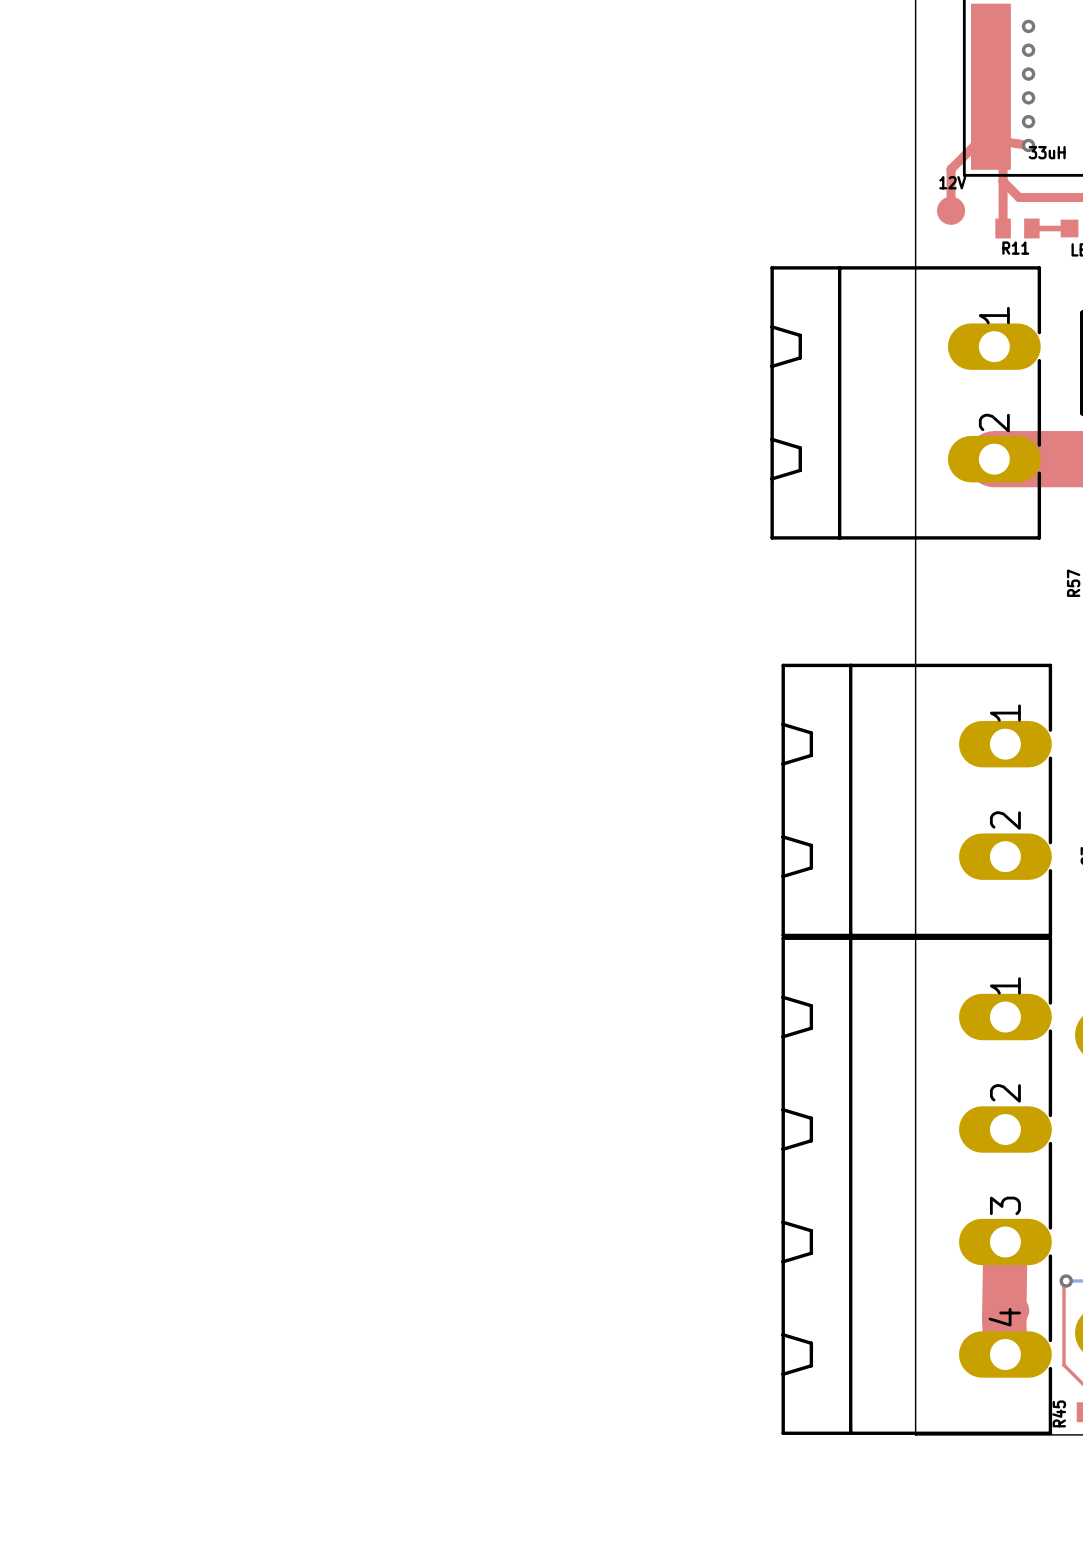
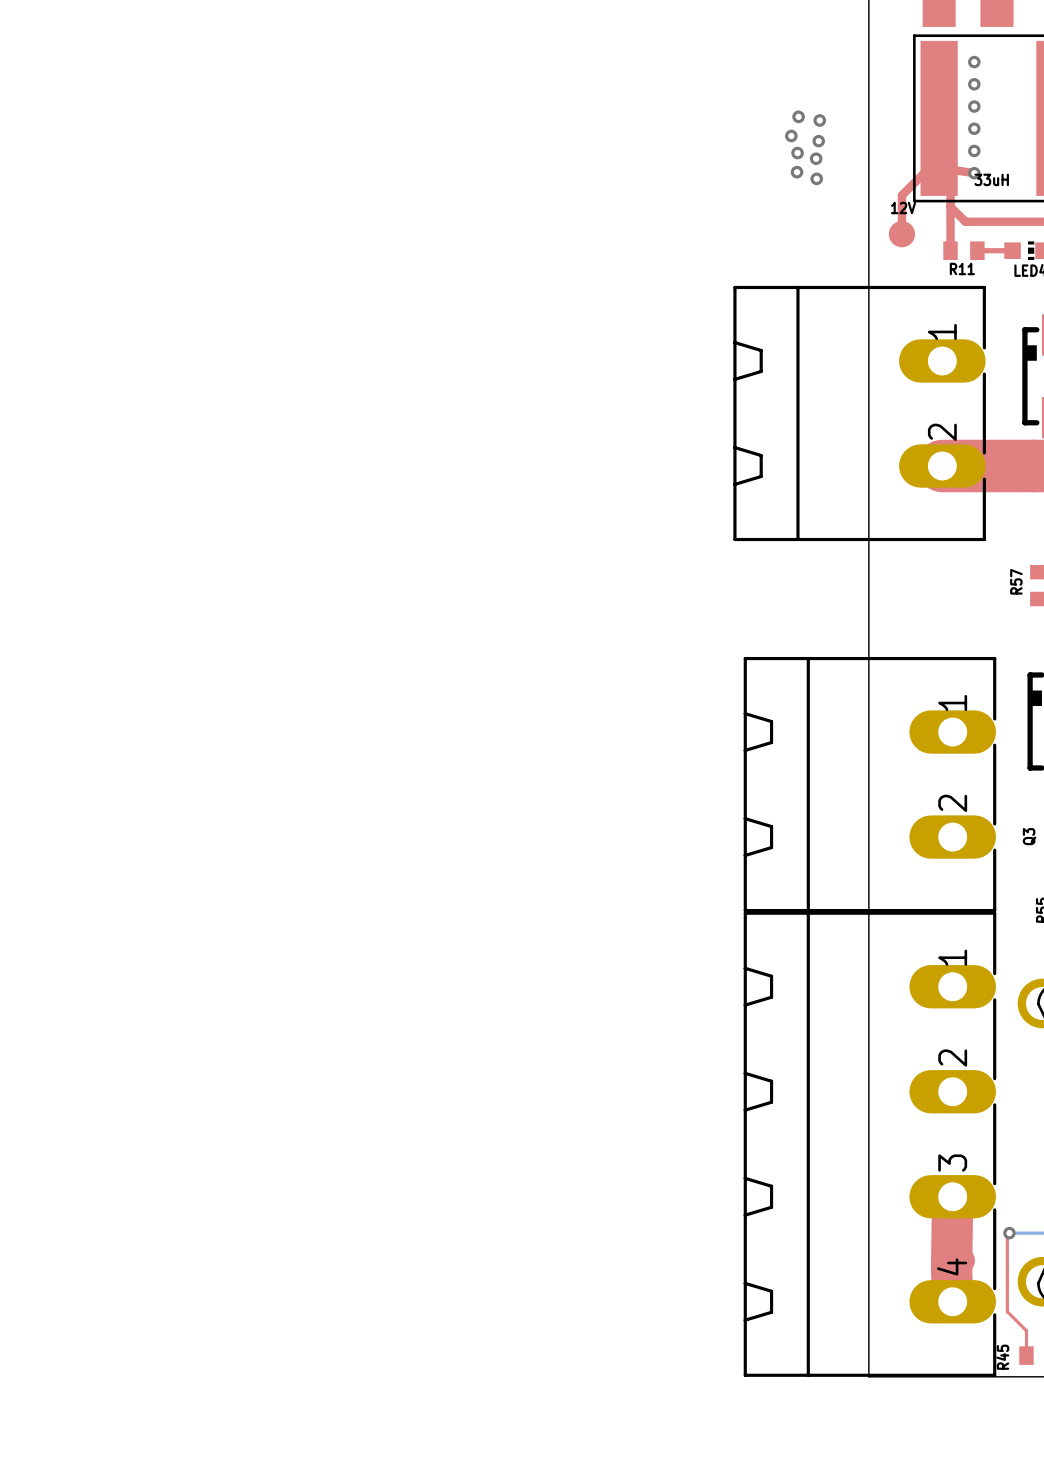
via: none -> (798, 116)
via: none -> (819, 120)
via: none -> (791, 135)
via: none -> (818, 141)
via: none -> (797, 153)
via: none -> (816, 158)
via: none -> (797, 172)
via: none -> (816, 178)

